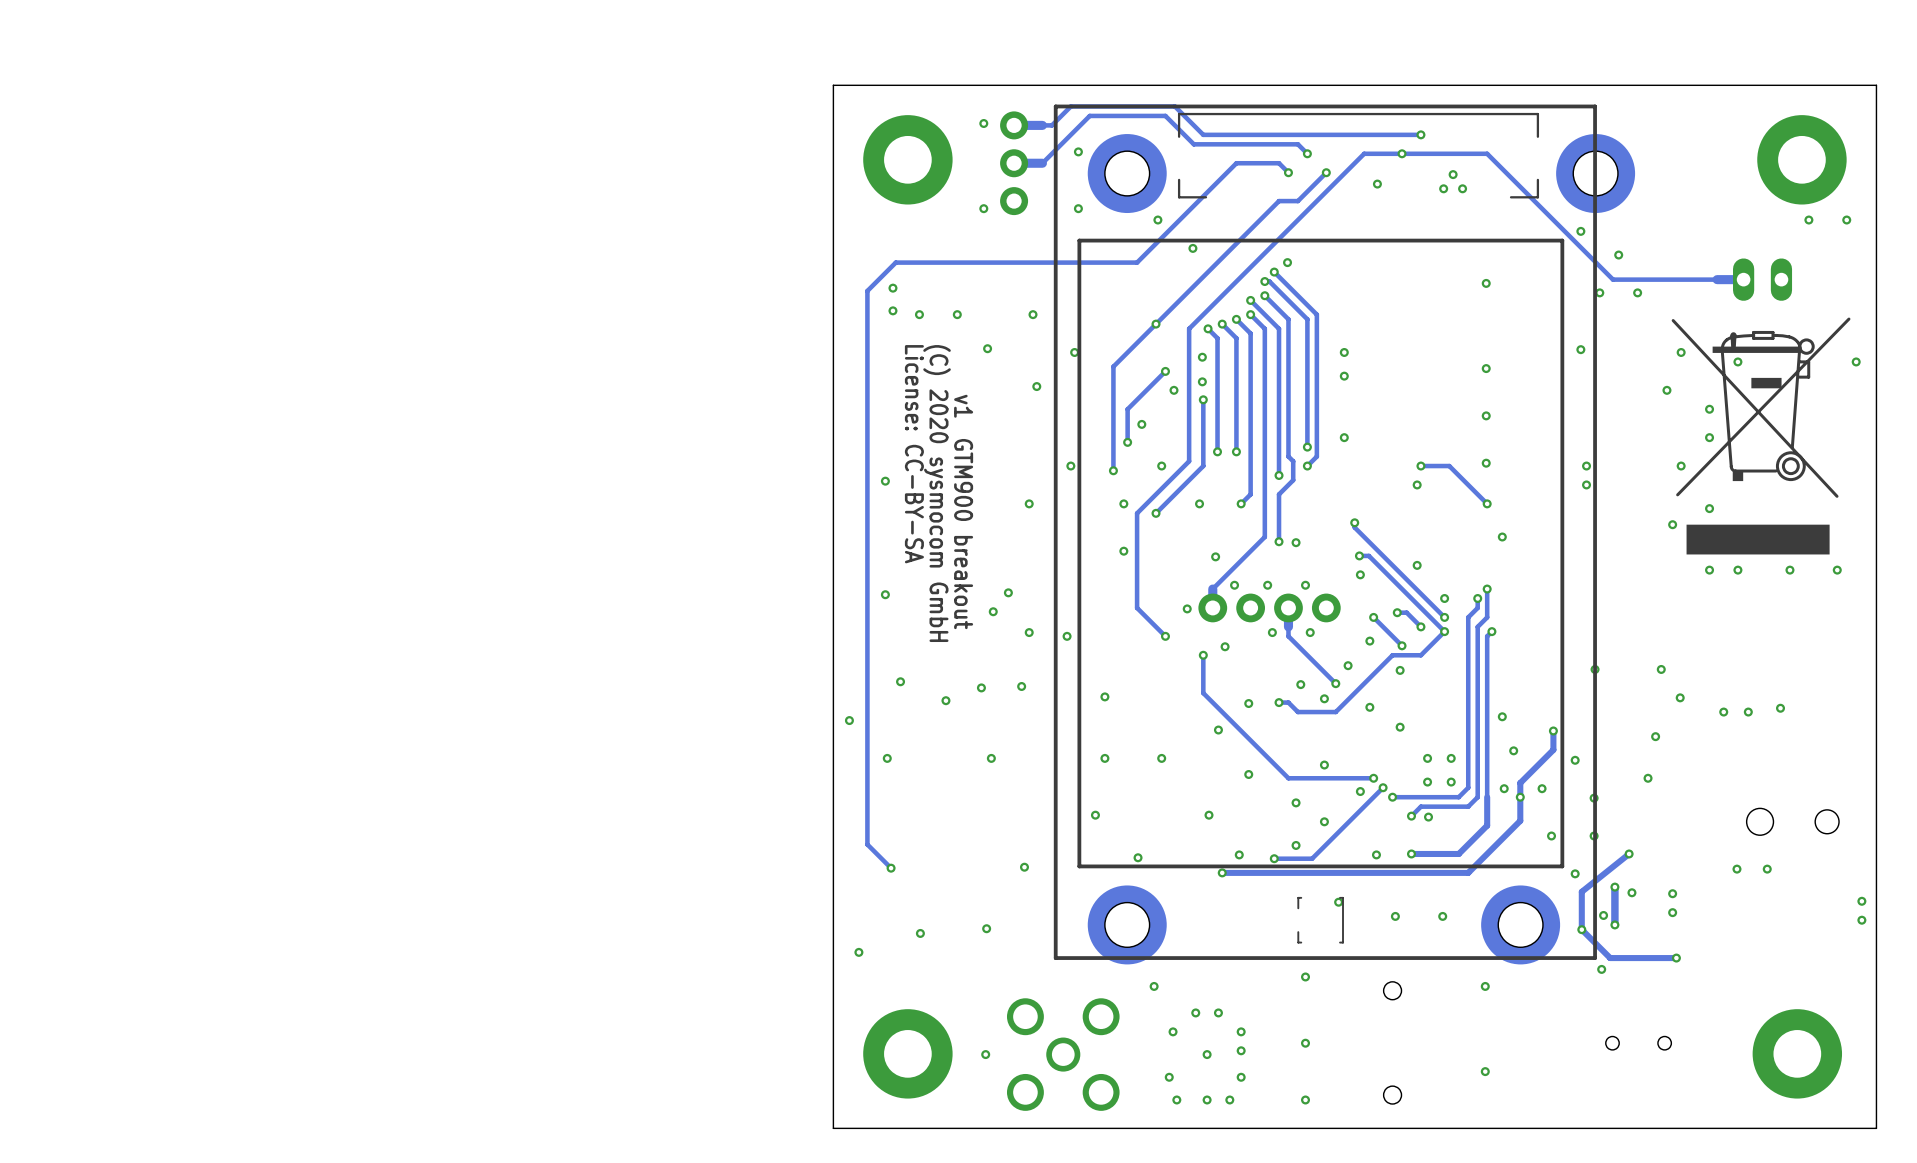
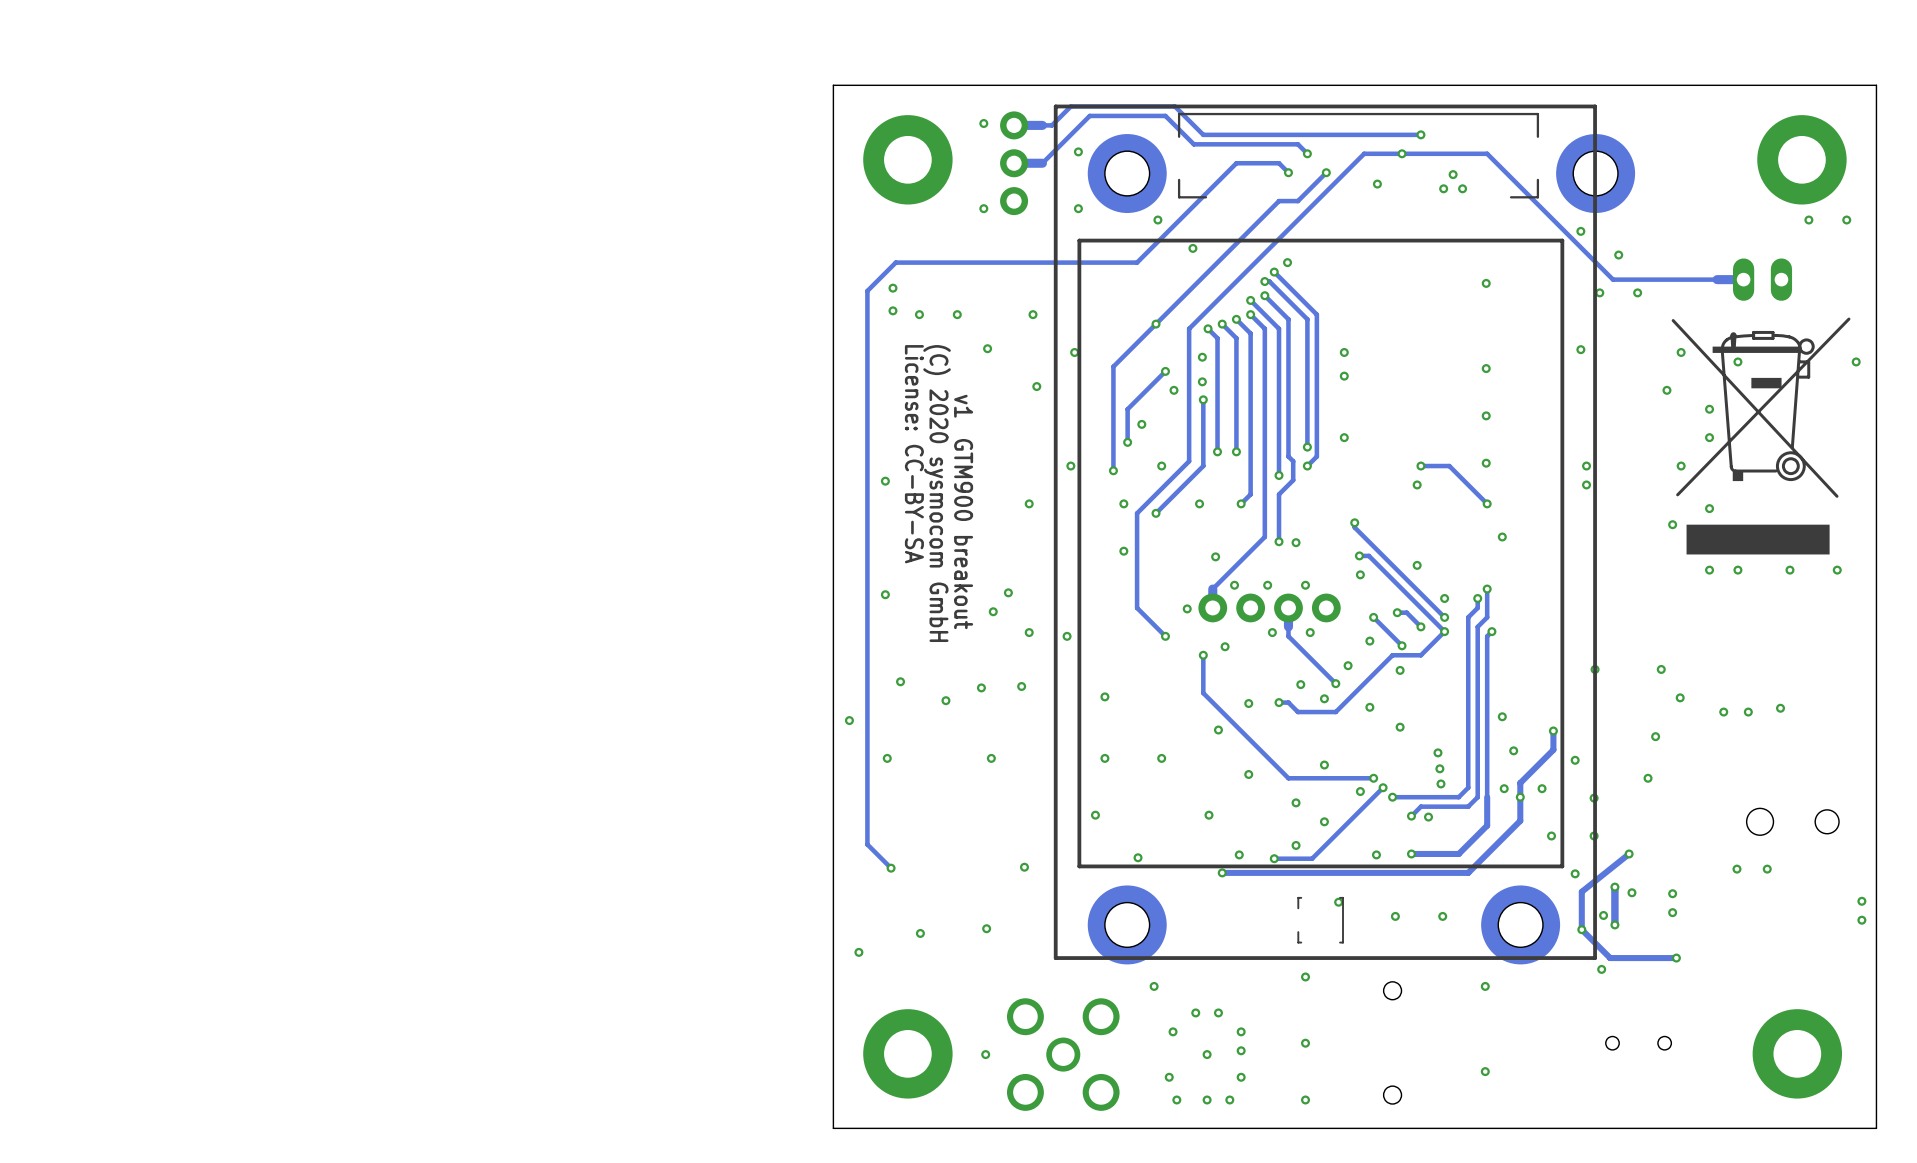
via: none -> (1437, 752)
via: (1427, 758) -> none
via: (1451, 758) -> none
via: none -> (1439, 768)
via: (1427, 782) -> none
via: (1451, 782) -> none
via: none -> (1440, 783)

